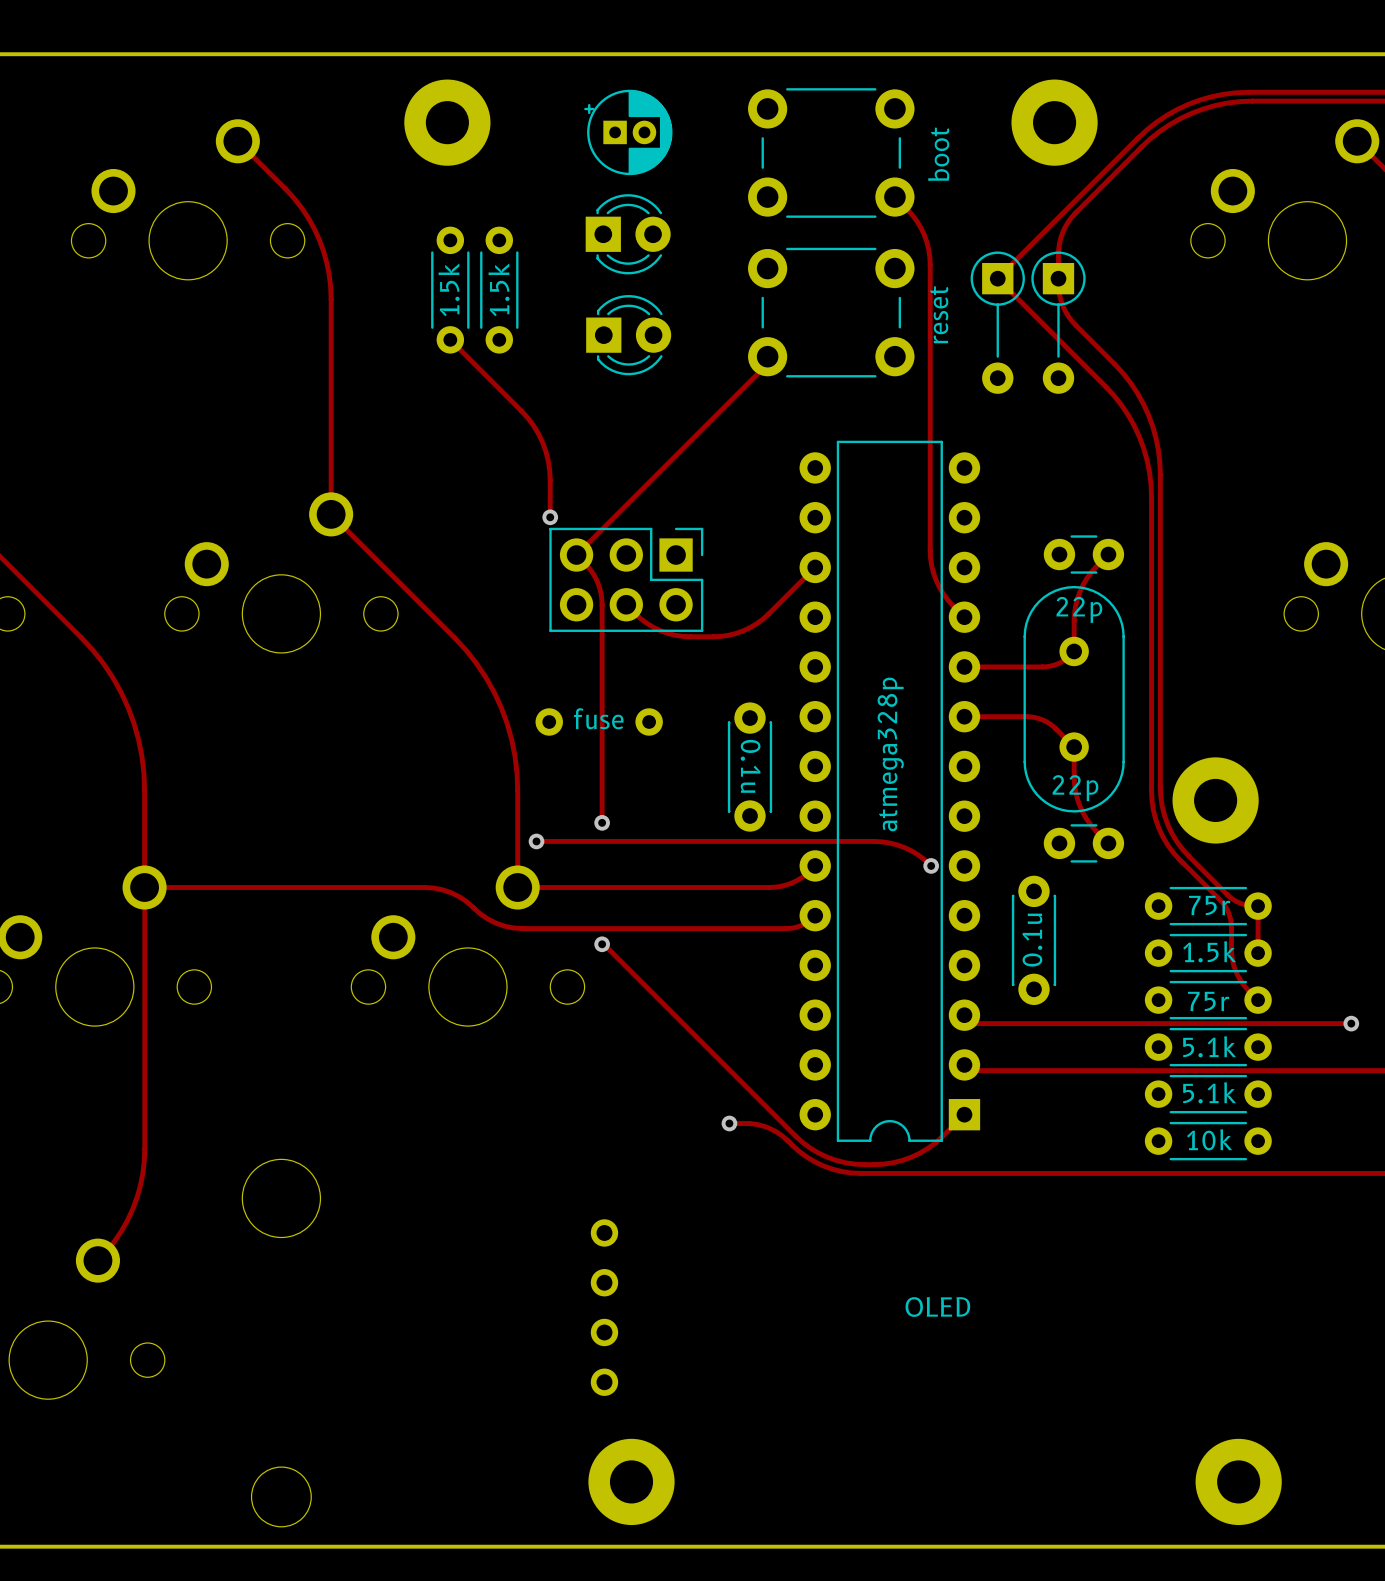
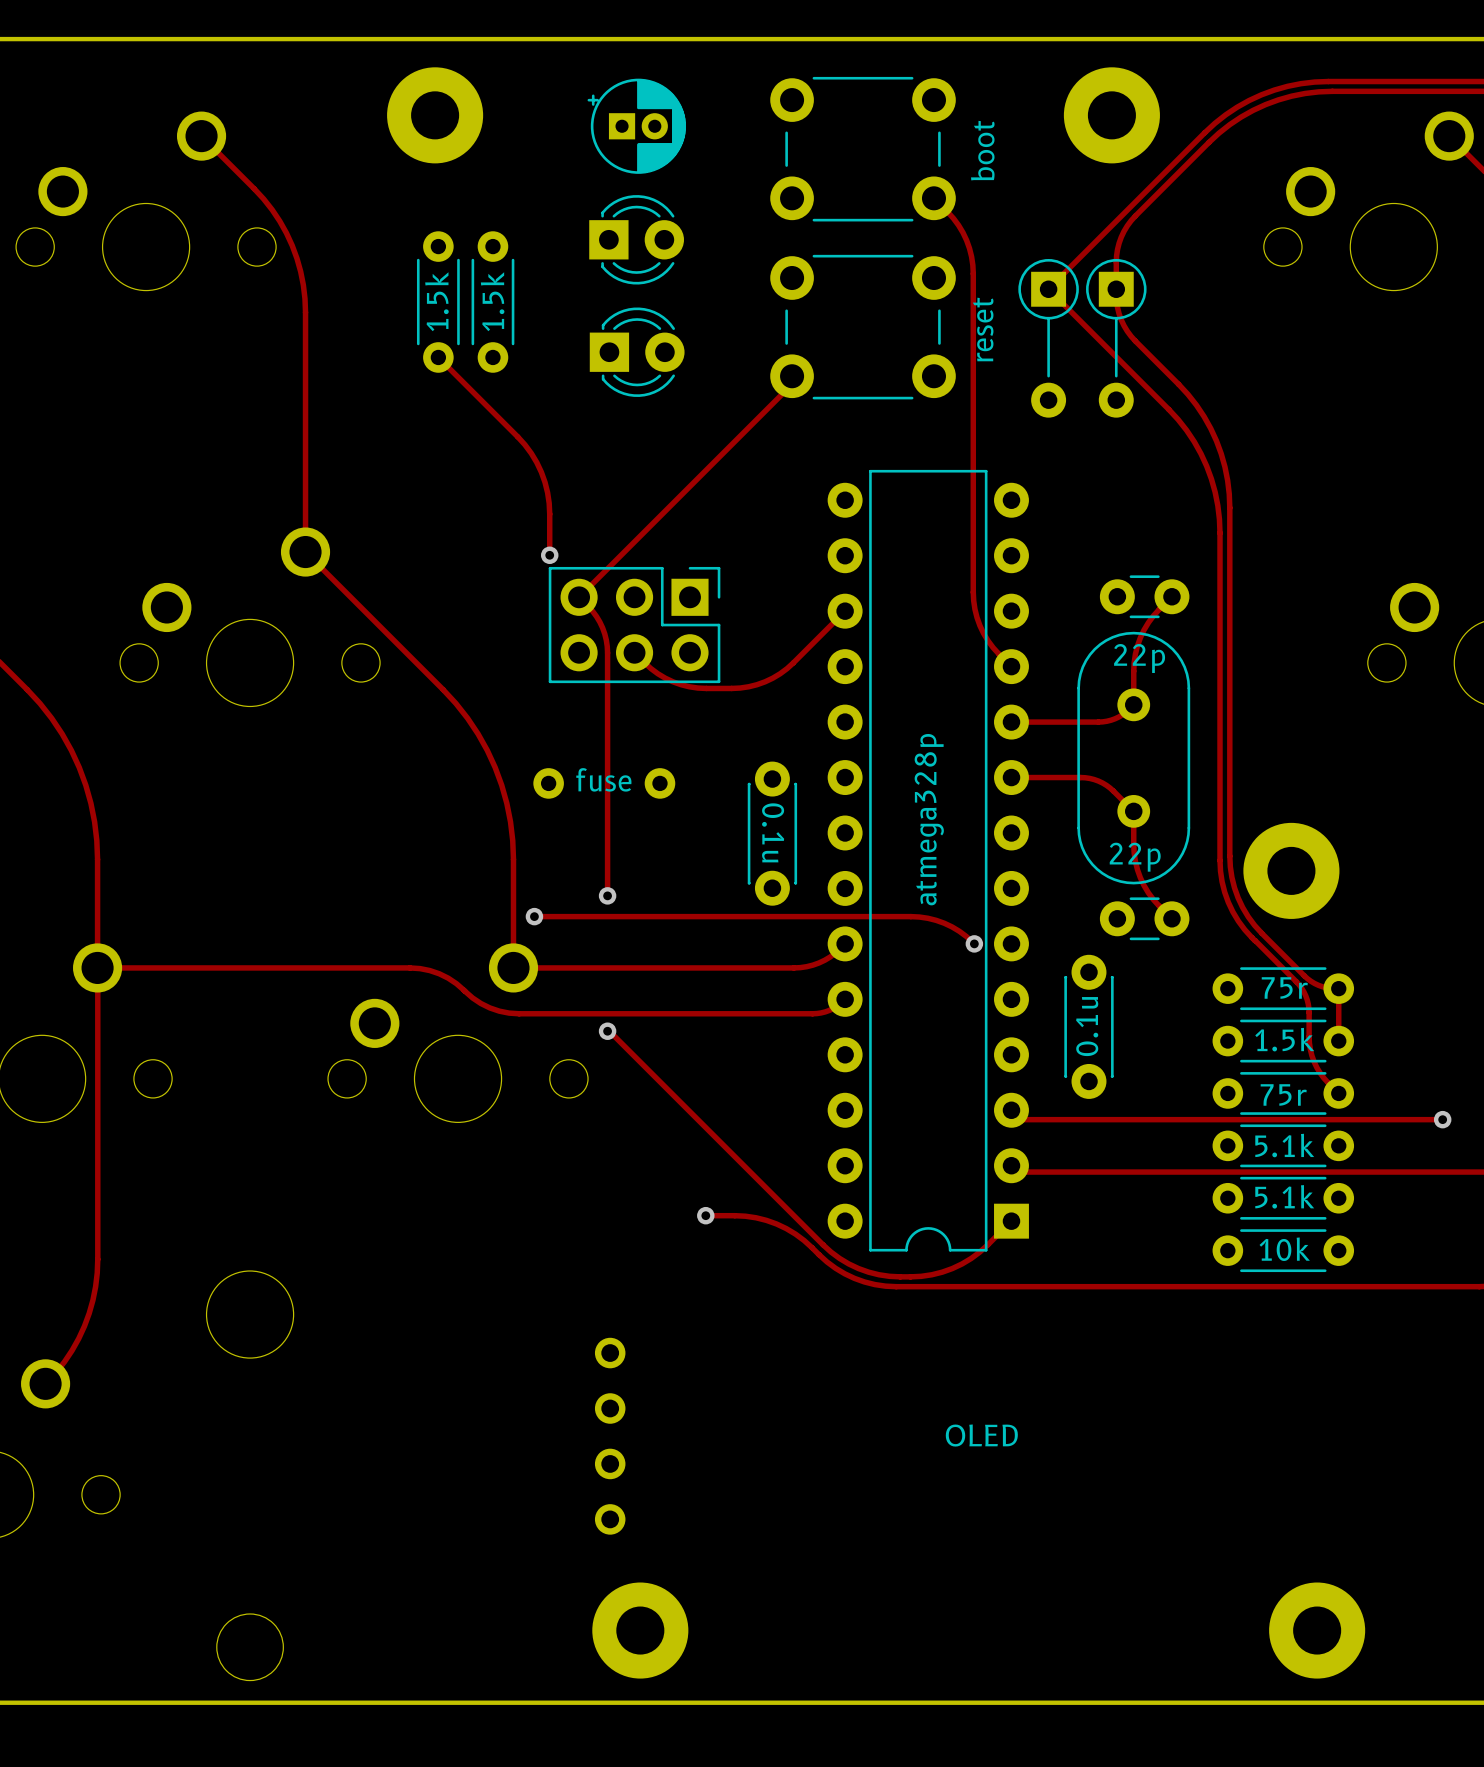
track: (729, 1123) (763, 1126) (776, 1131) (787, 1140) -> (705, 1215) (745, 1216) (766, 1220) (795, 1234) (814, 1250)
via position: (729, 1123) -> (705, 1215)

